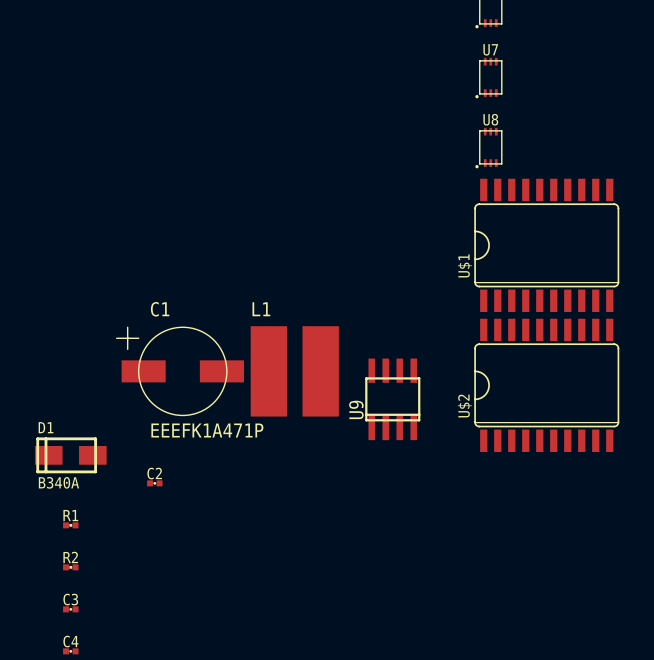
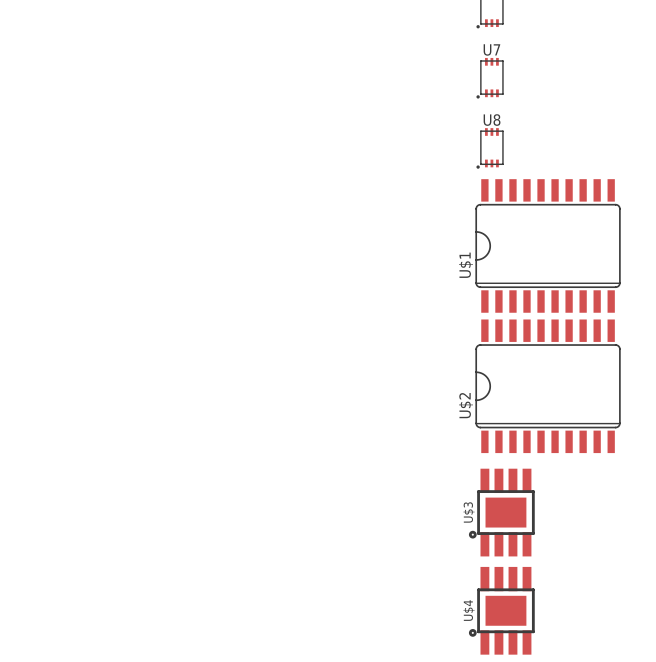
C1: EEEFK1A471P (179, 371) -> none
L1: (294, 371) -> none
U9: (392, 399) -> none
D1: B340A (70, 455) -> none
C2: (154, 483) -> none
U$3: none -> (501, 512)
R1: (70, 525) -> none
R2: (70, 567) -> none
C3: (70, 609) -> none
U$4: none -> (501, 610)
C4: (70, 651) -> none

